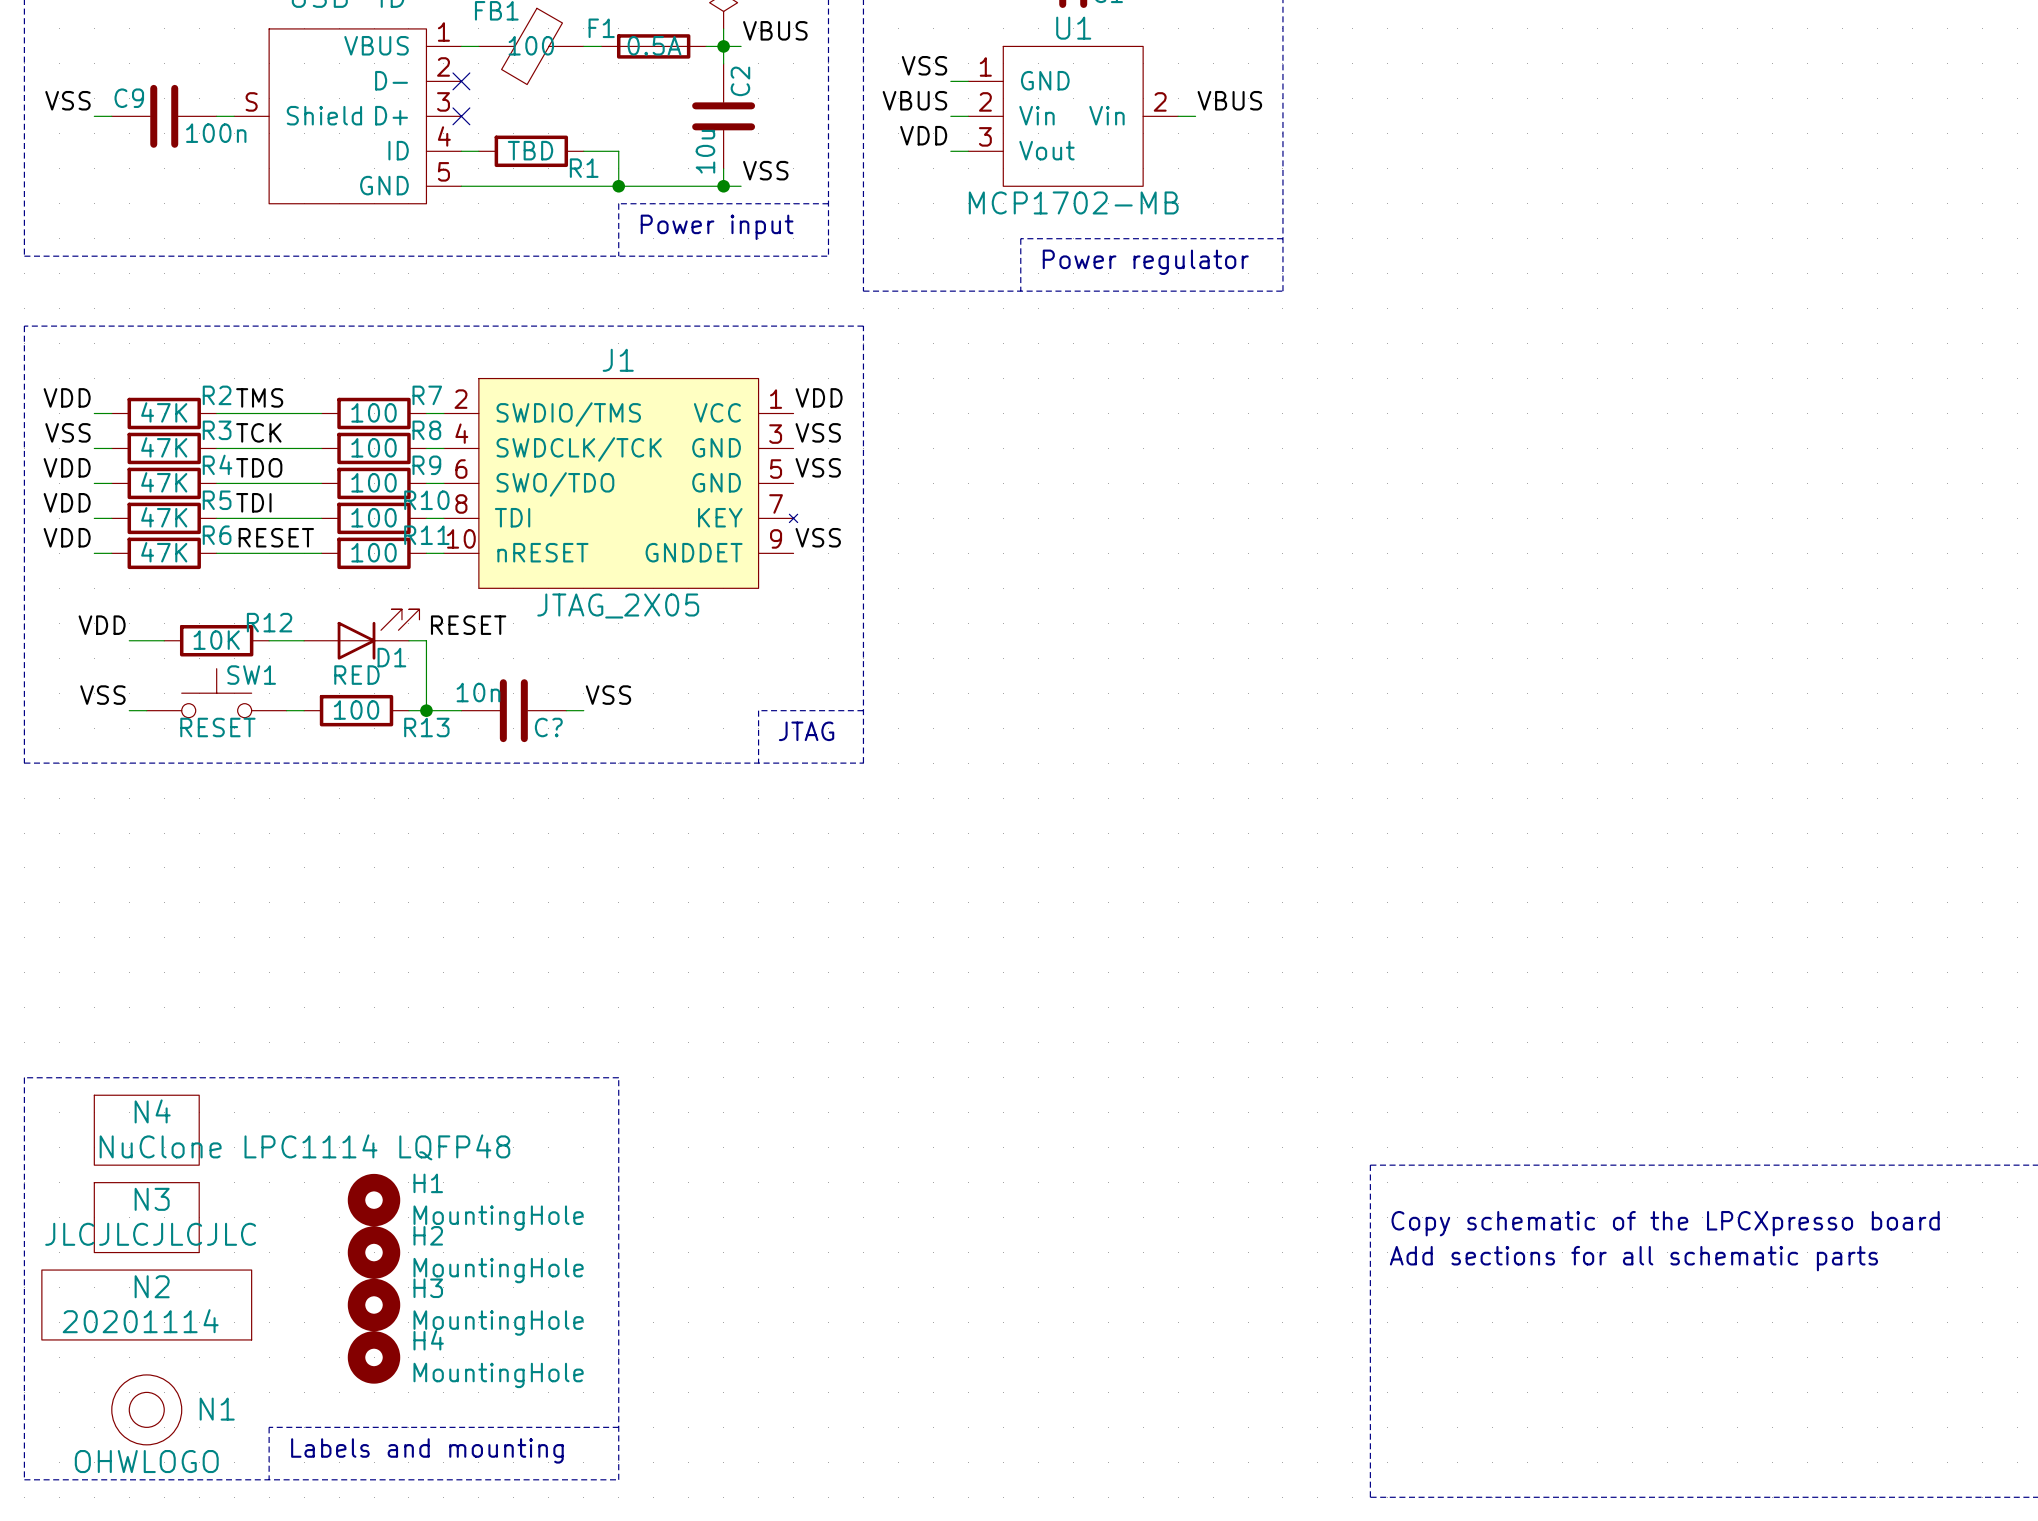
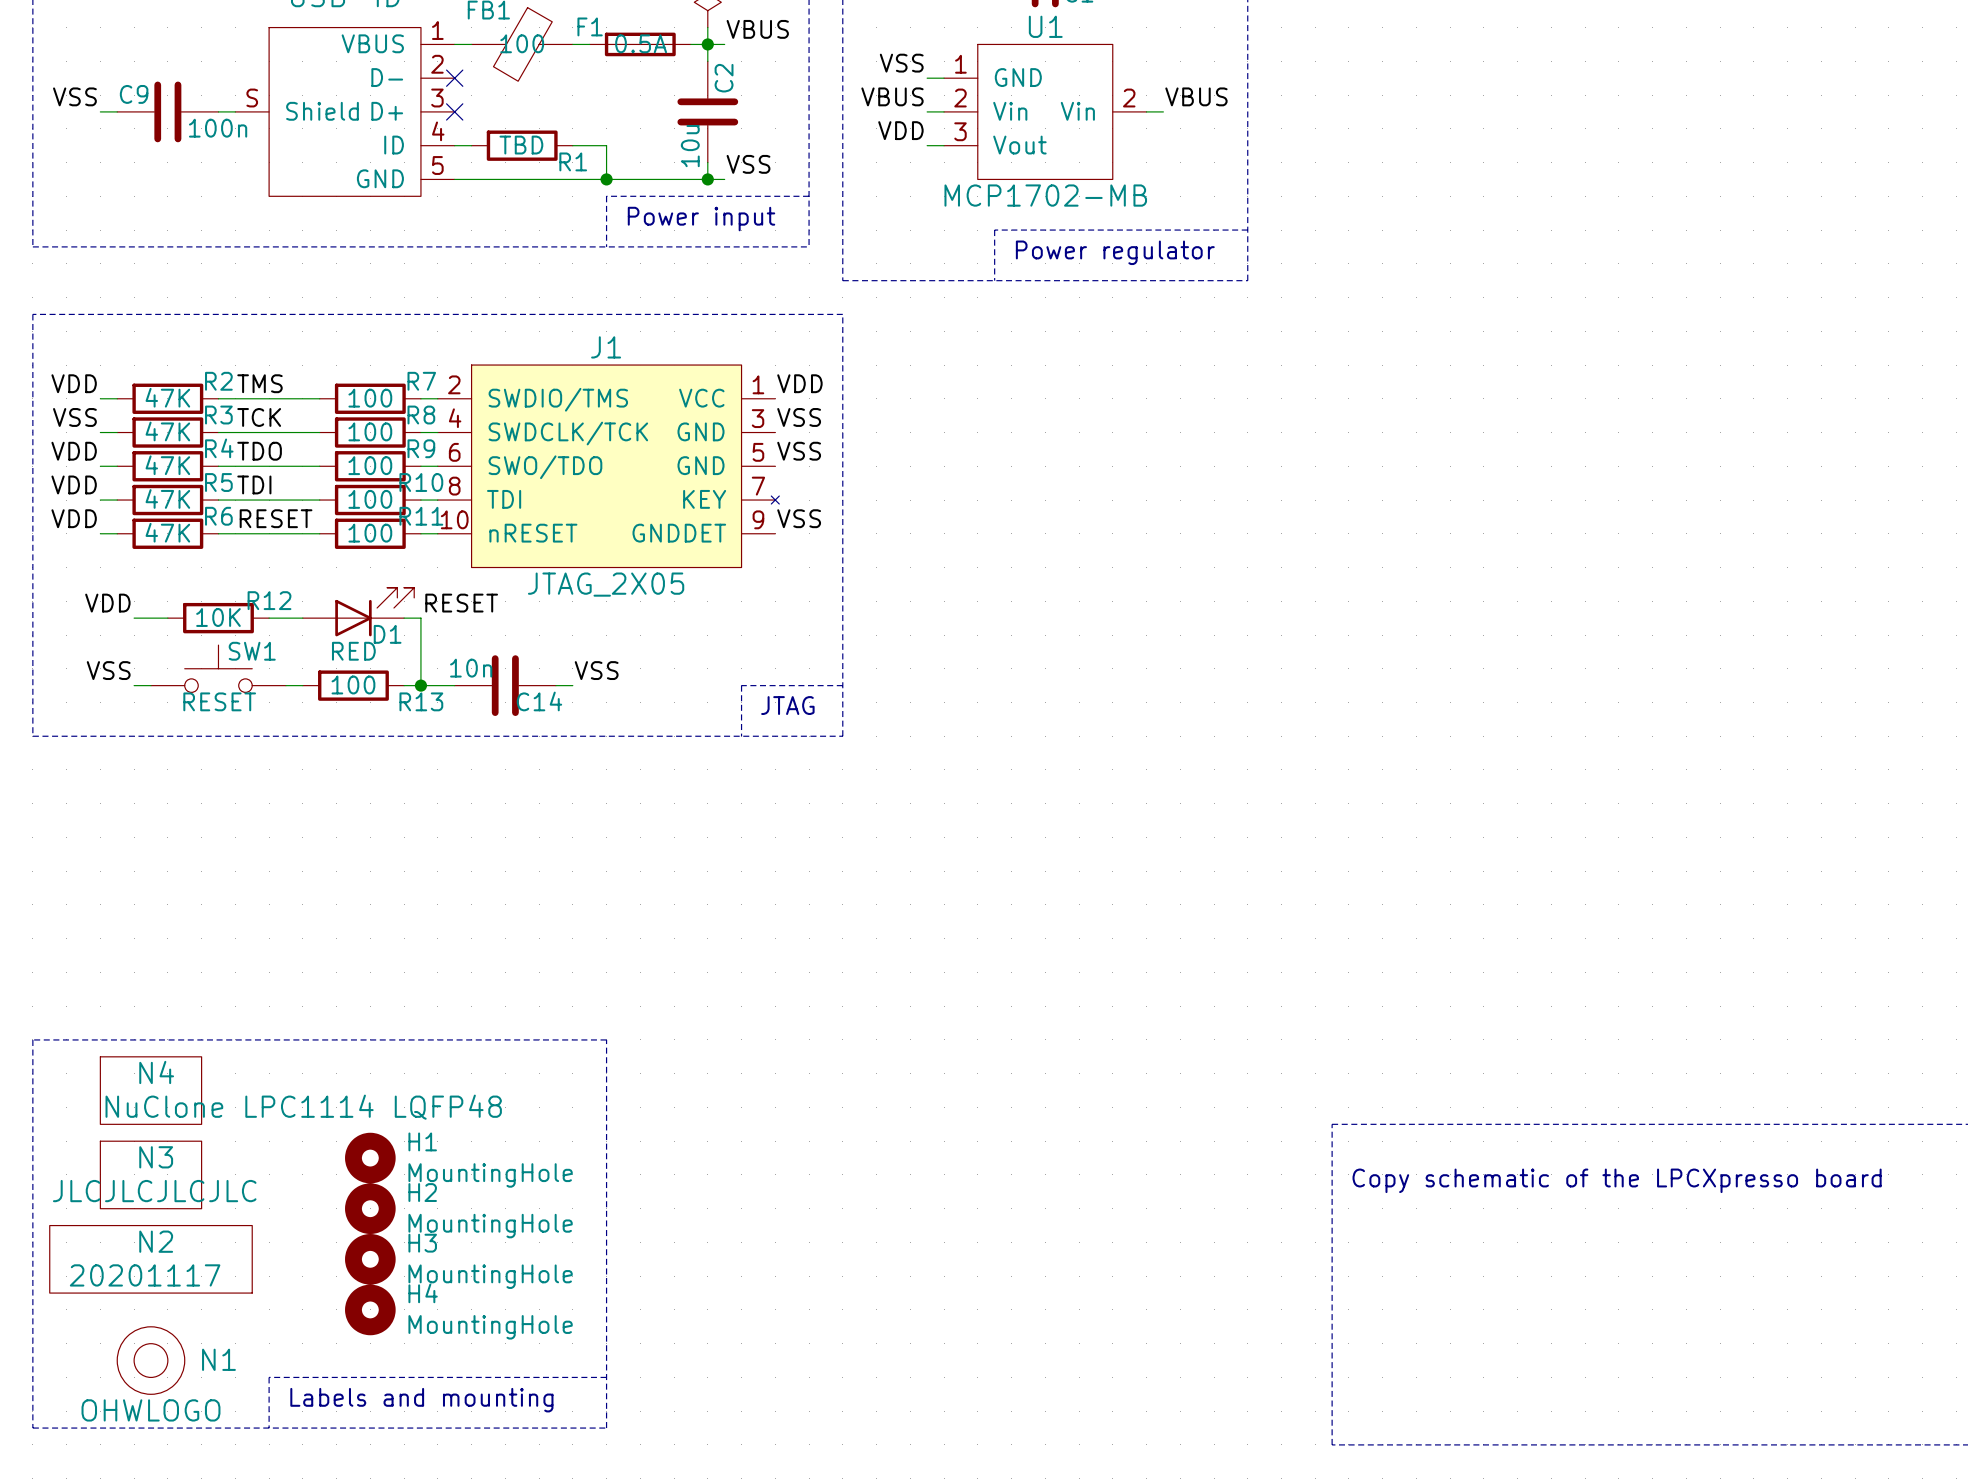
C? name: C? (548, 727) -> C14 (539, 701)
text: Add sections for all schematic parts (1633, 1258) -> none
N2 value: 20201114 (140, 1321) -> 20201117 (145, 1275)

